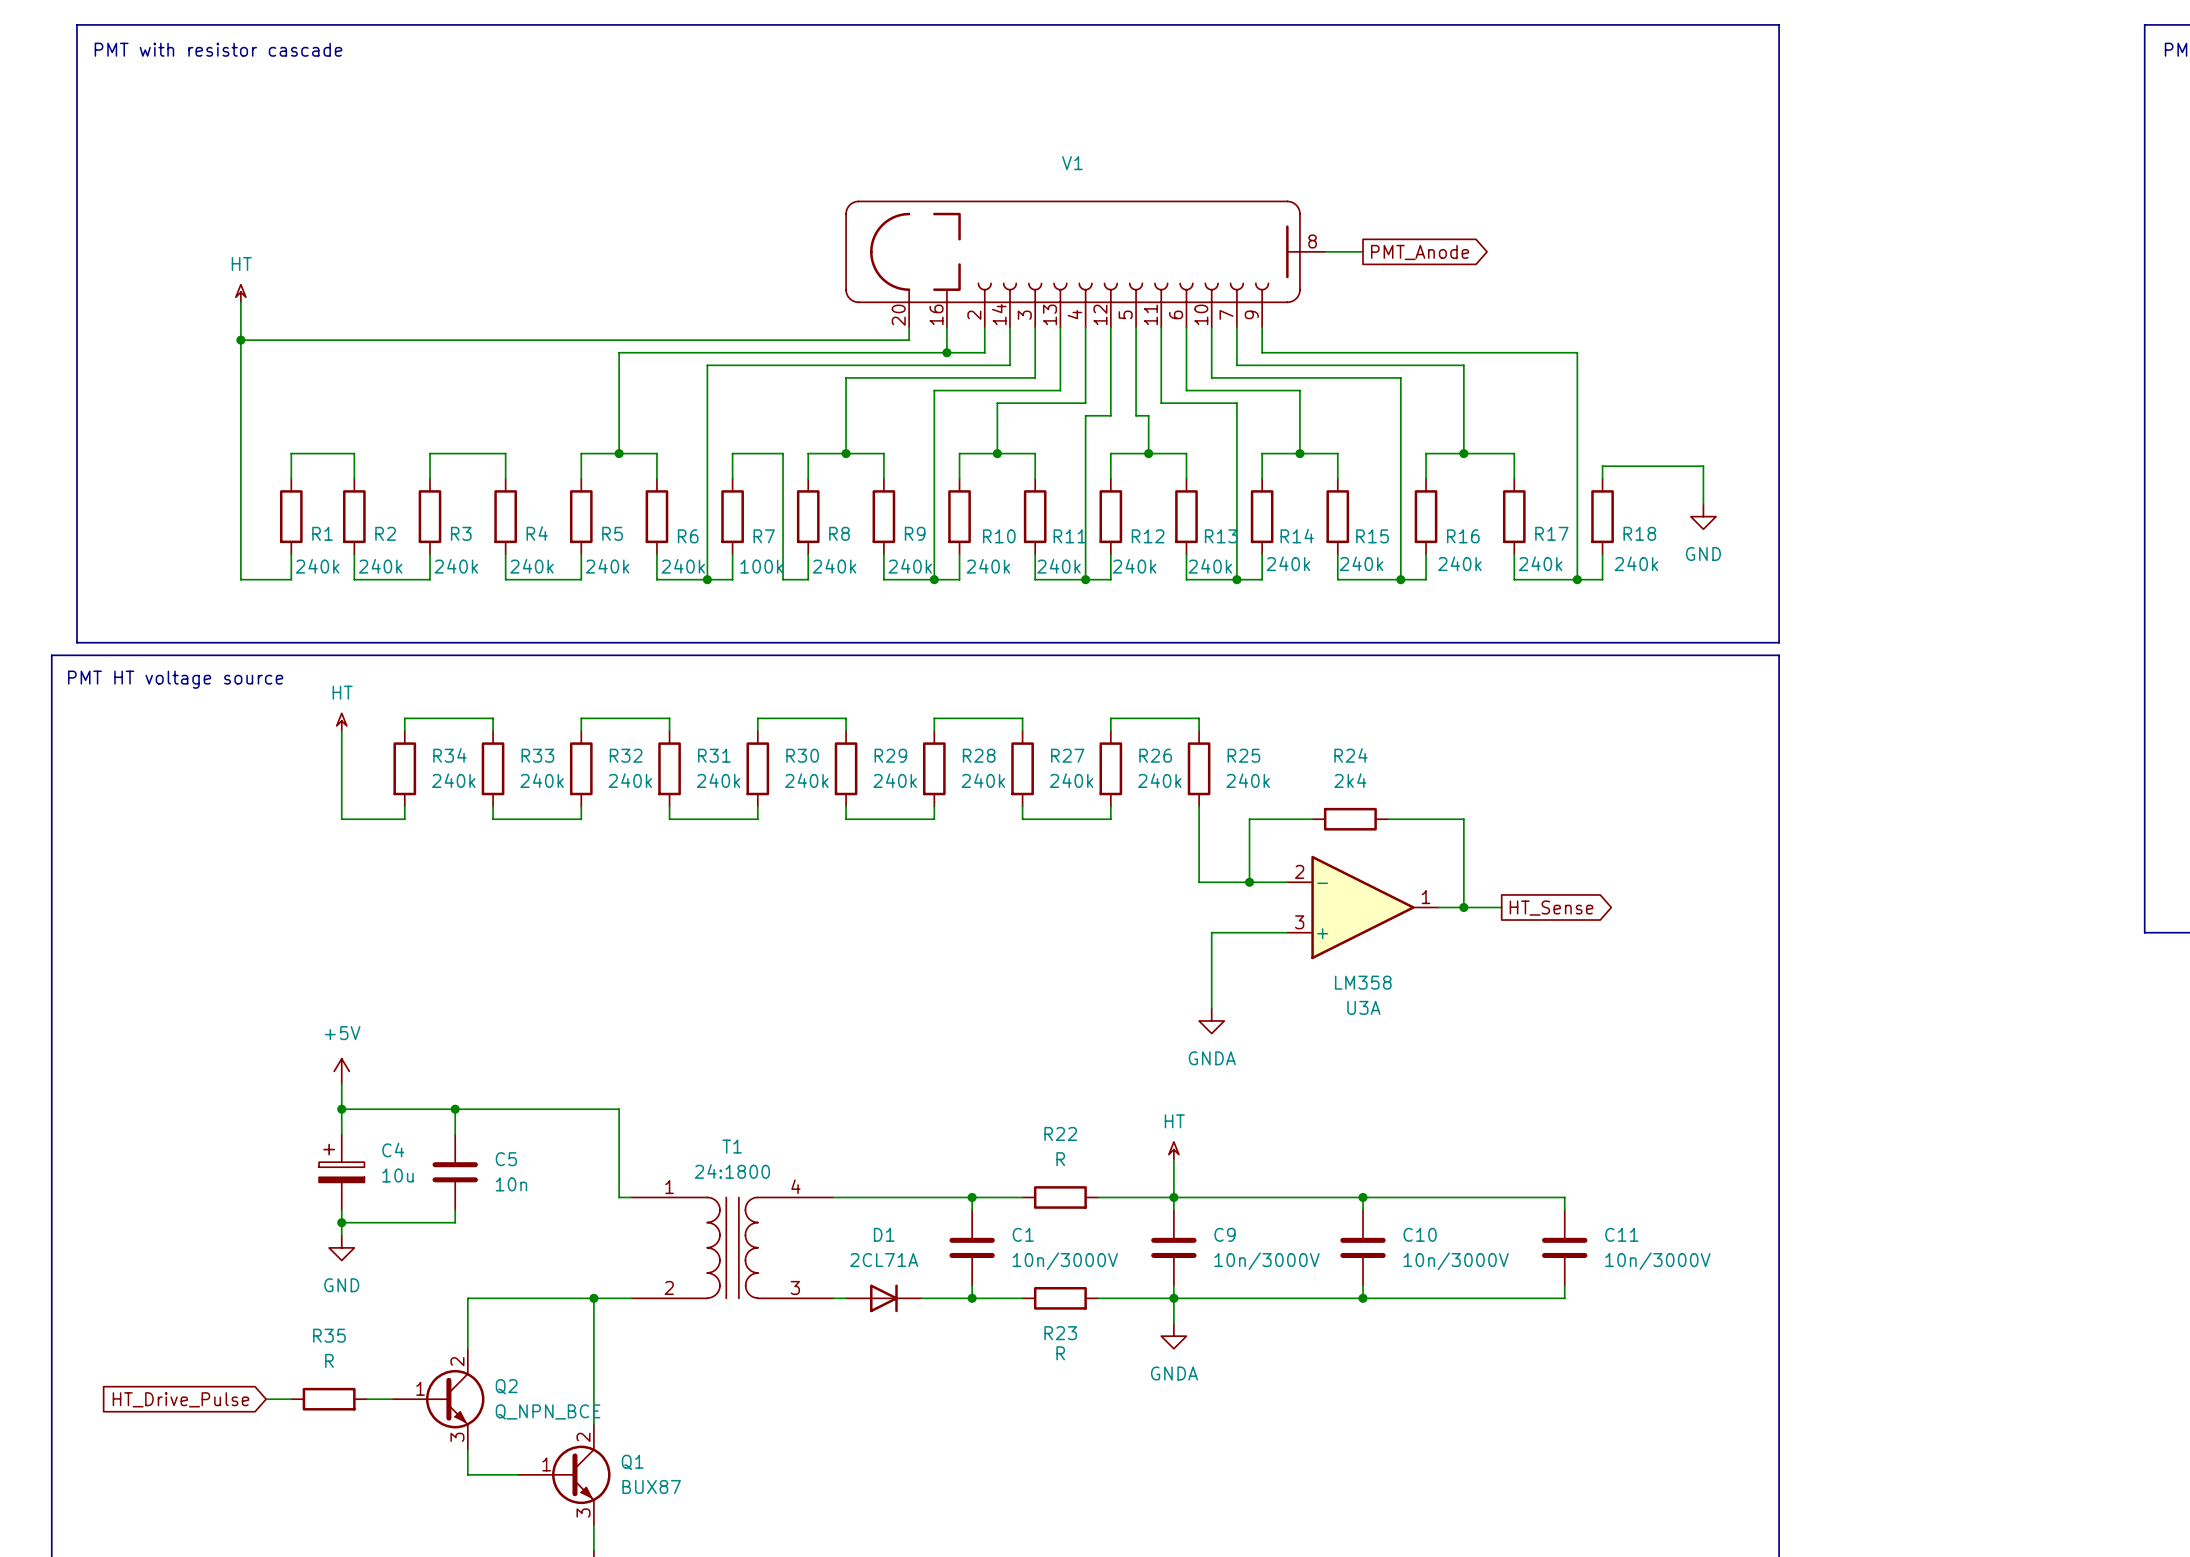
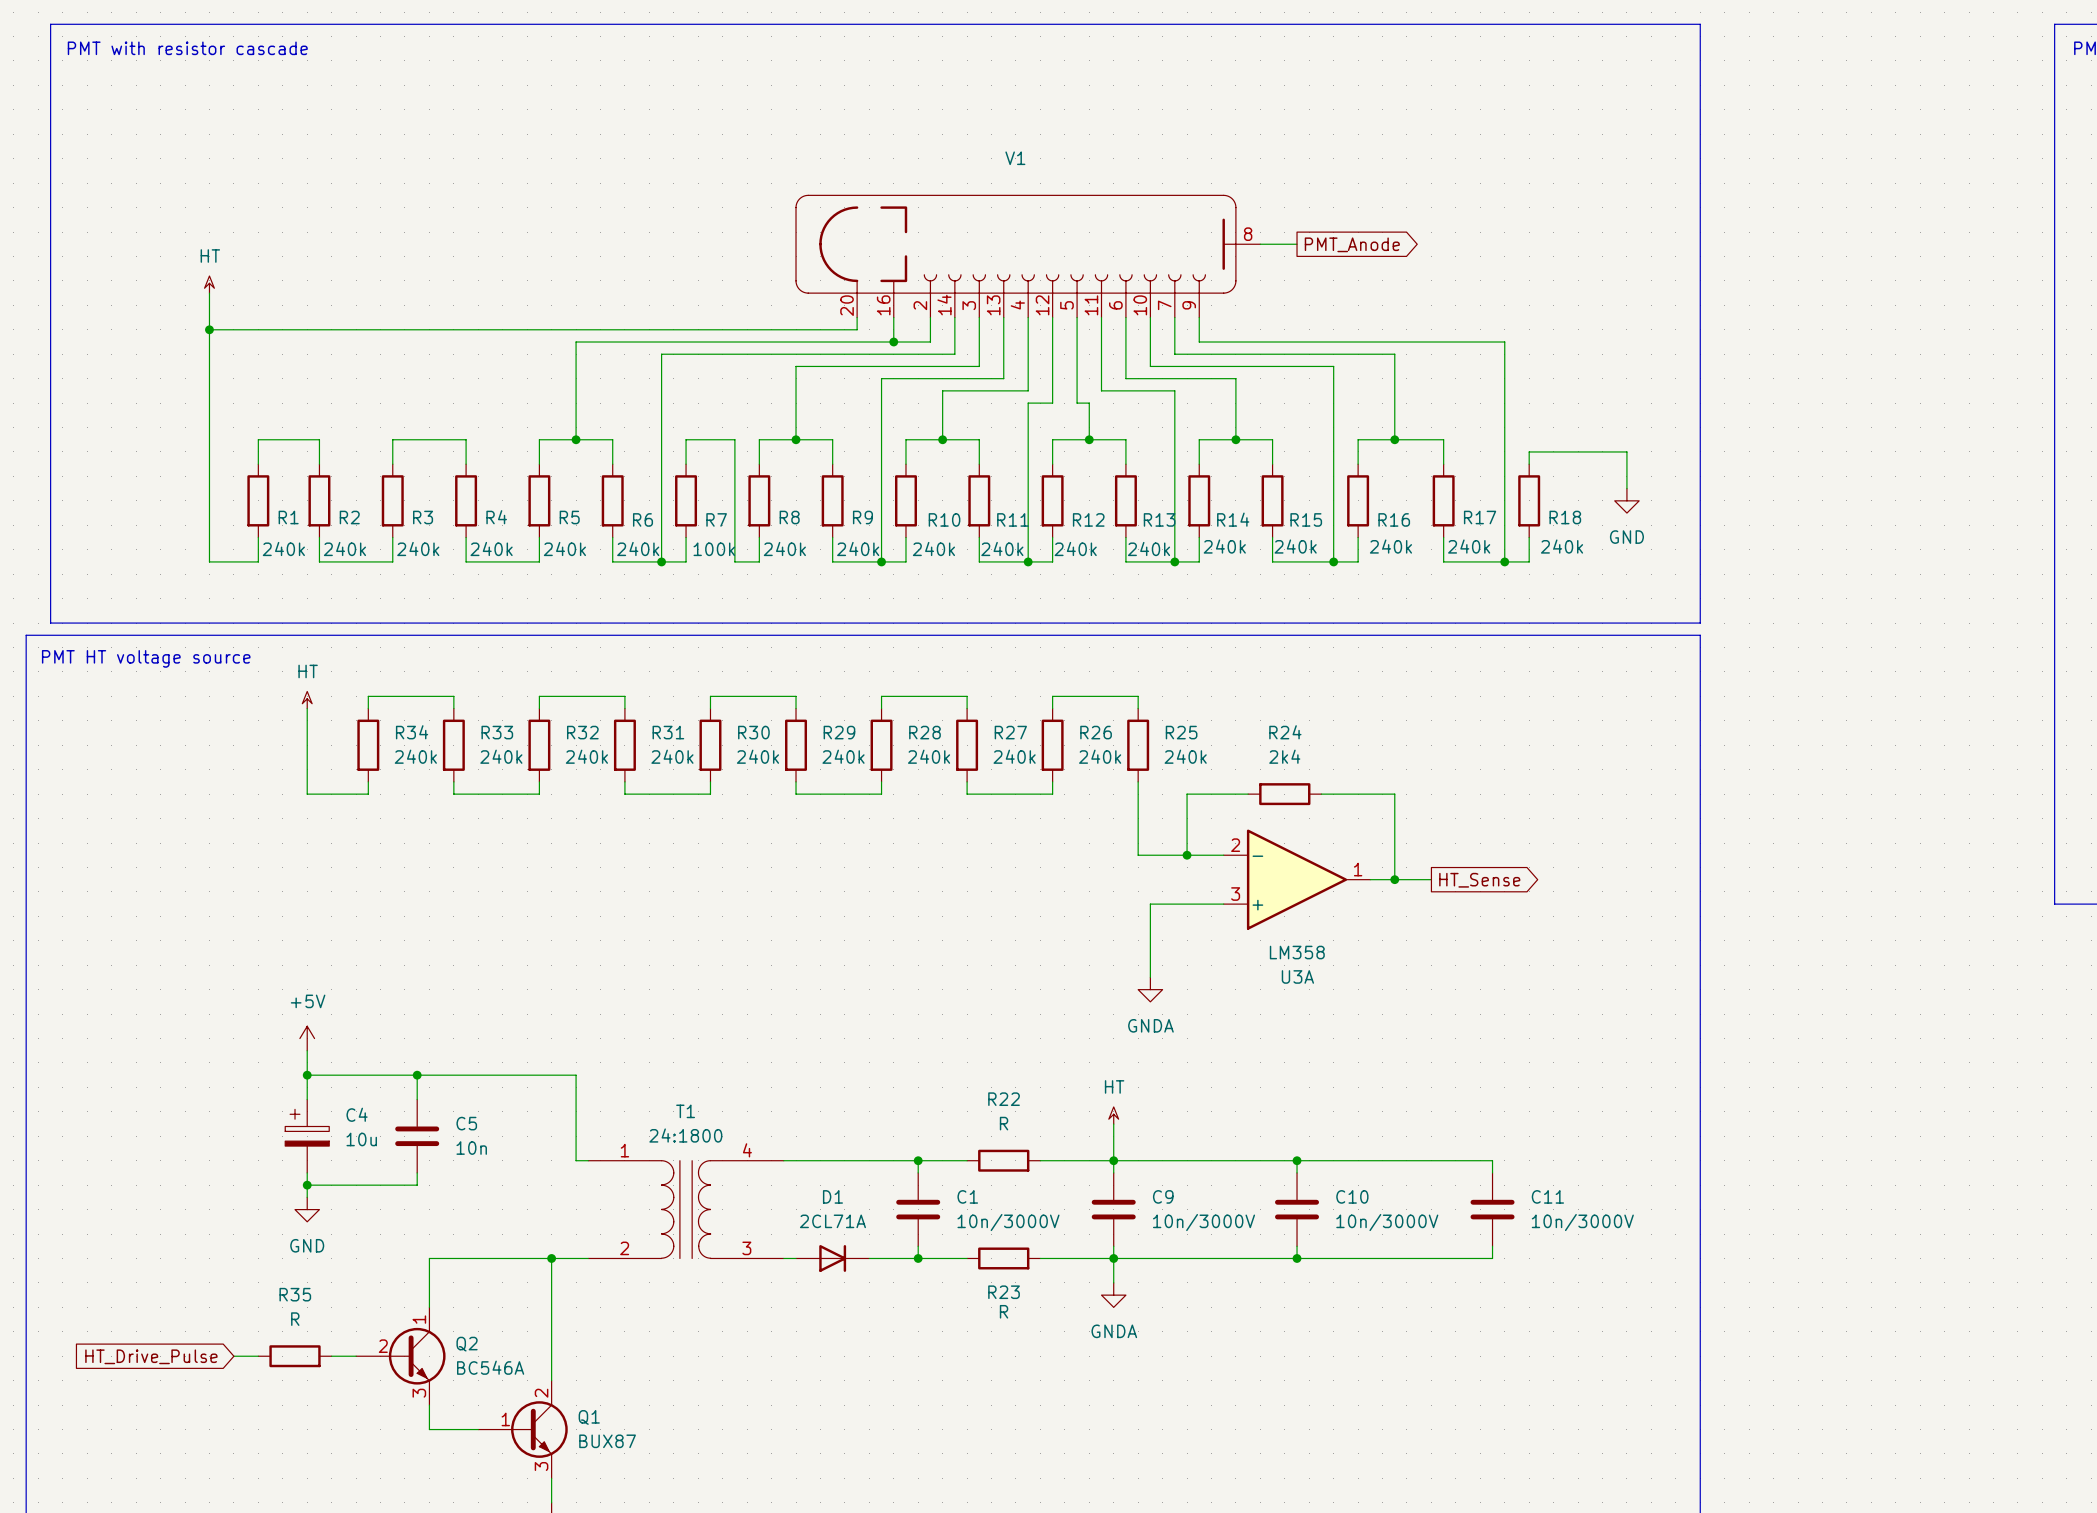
Q2 pin number: 2 (457, 1361) -> 1 (419, 1319)
Q2 pin number: 1 (420, 1388) -> 2 (383, 1346)
Q2 value: Q_NPN_BCE (548, 1411) -> BC546A (490, 1367)

